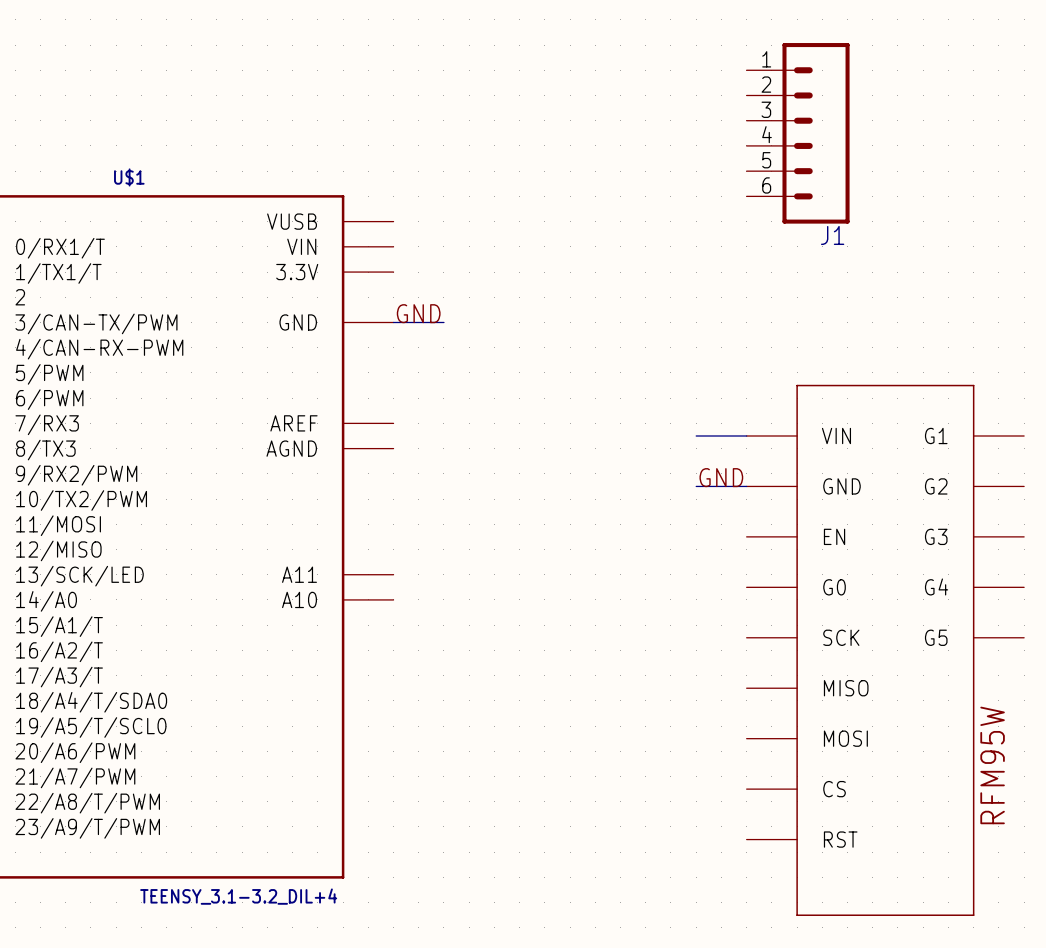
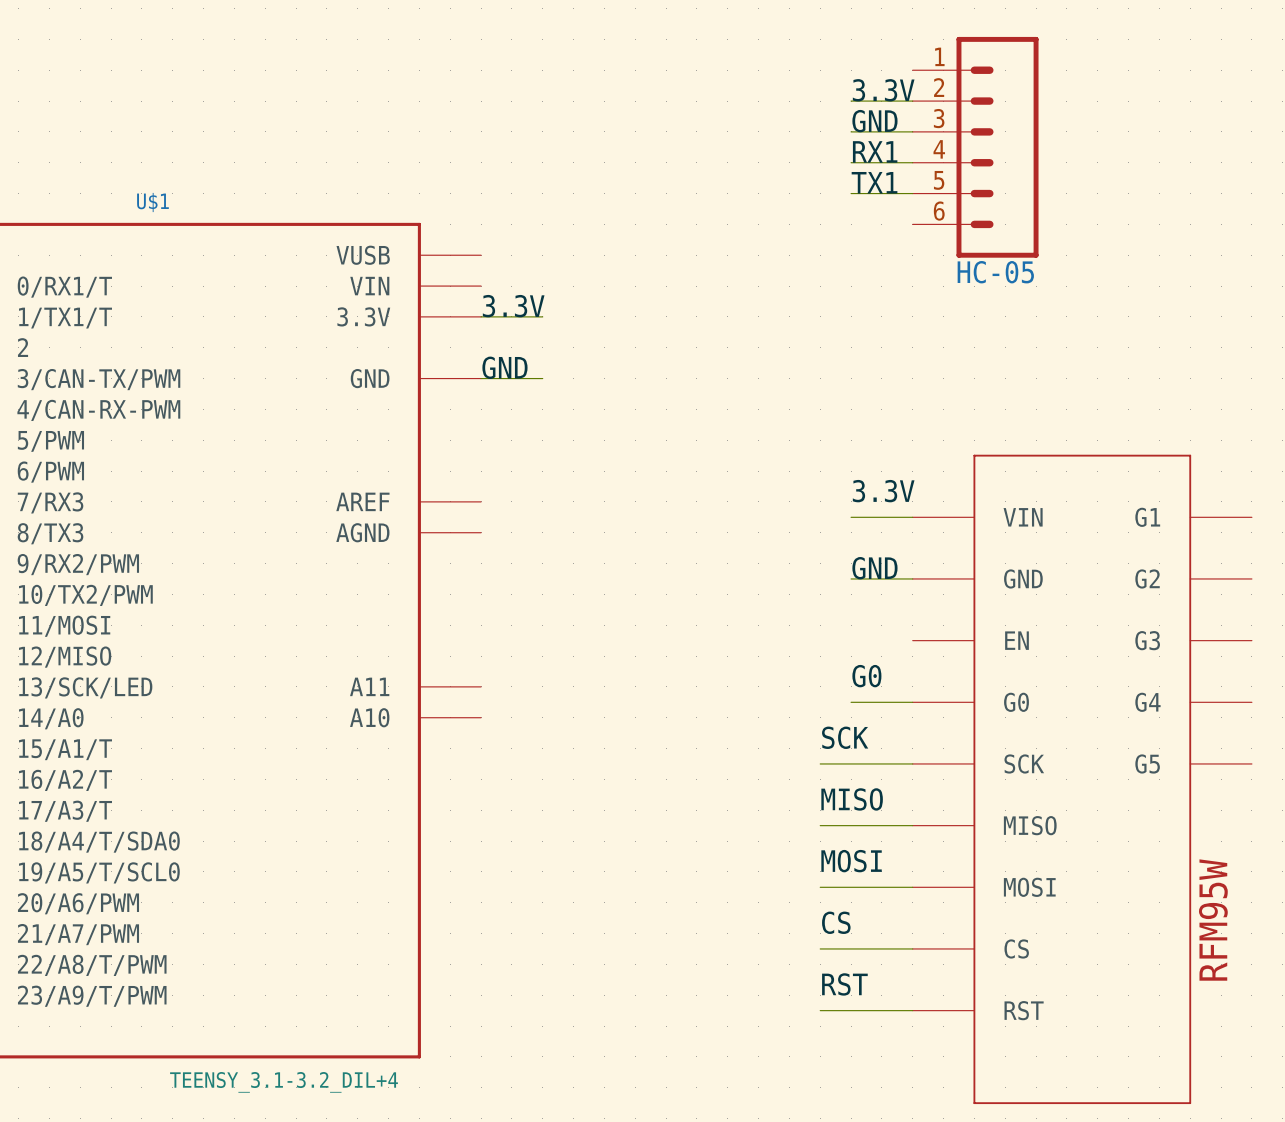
label: none -> 3.3V (883, 90)
wire: none -> (851, 101) (912, 101)
label: none -> GND (874, 121)
wire: none -> (851, 131) (912, 131)
label: none -> RX1 (875, 151)
wire: none -> (851, 162) (912, 162)
label: none -> TX1 (874, 182)
wire: none -> (851, 193) (912, 193)
J1 name: J1 (832, 235) -> HC-05 (995, 272)
label: none -> 3.3V (513, 306)
wire: none -> (481, 316) (542, 316)
label: none -> 3.3V (883, 491)
label: none -> G0 (866, 676)
wire: none -> (851, 702) (912, 702)
label: none -> SCK (845, 737)
wire: none -> (820, 763) (912, 763)
label: none -> MISO (852, 799)
wire: none -> (820, 825) (912, 825)
label: none -> MOSI (851, 861)
wire: none -> (820, 887) (912, 887)
label: none -> CS (836, 922)
wire: none -> (820, 948) (912, 948)
label: none -> RST (844, 984)
wire: none -> (820, 1010) (912, 1010)

